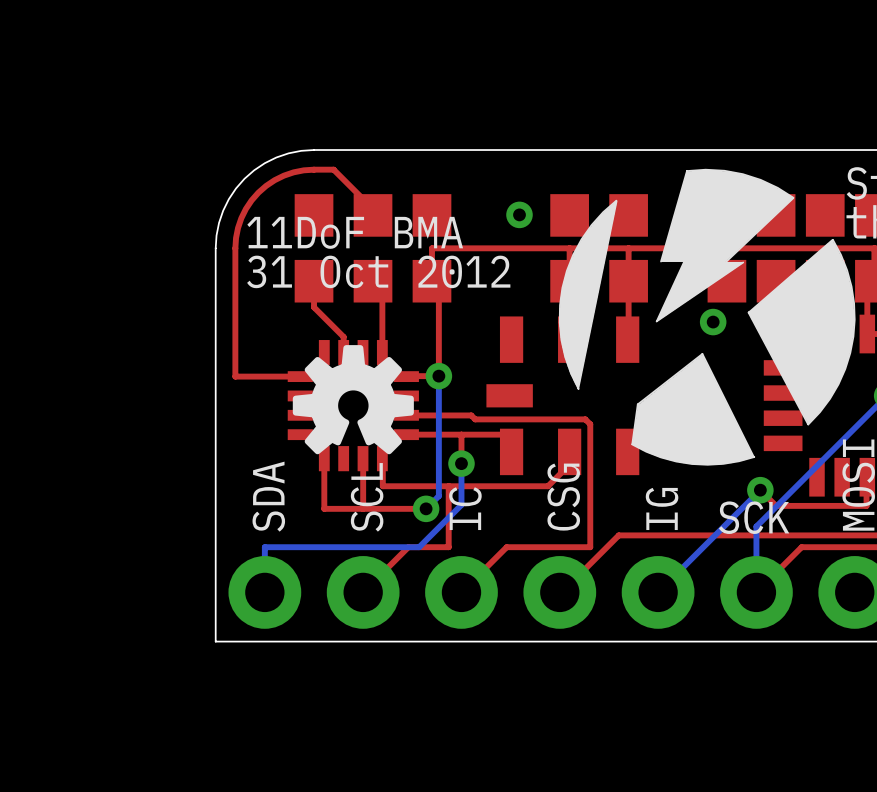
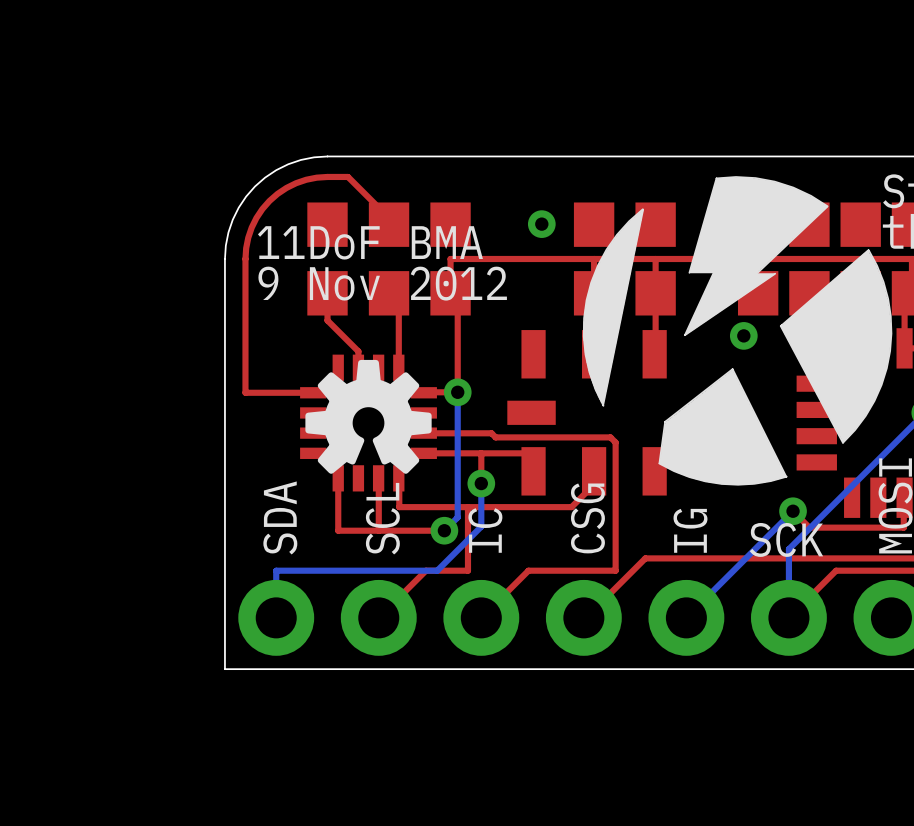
text: 31 Oct 2012 (378, 271) -> 9 Nov 2012 (382, 283)

